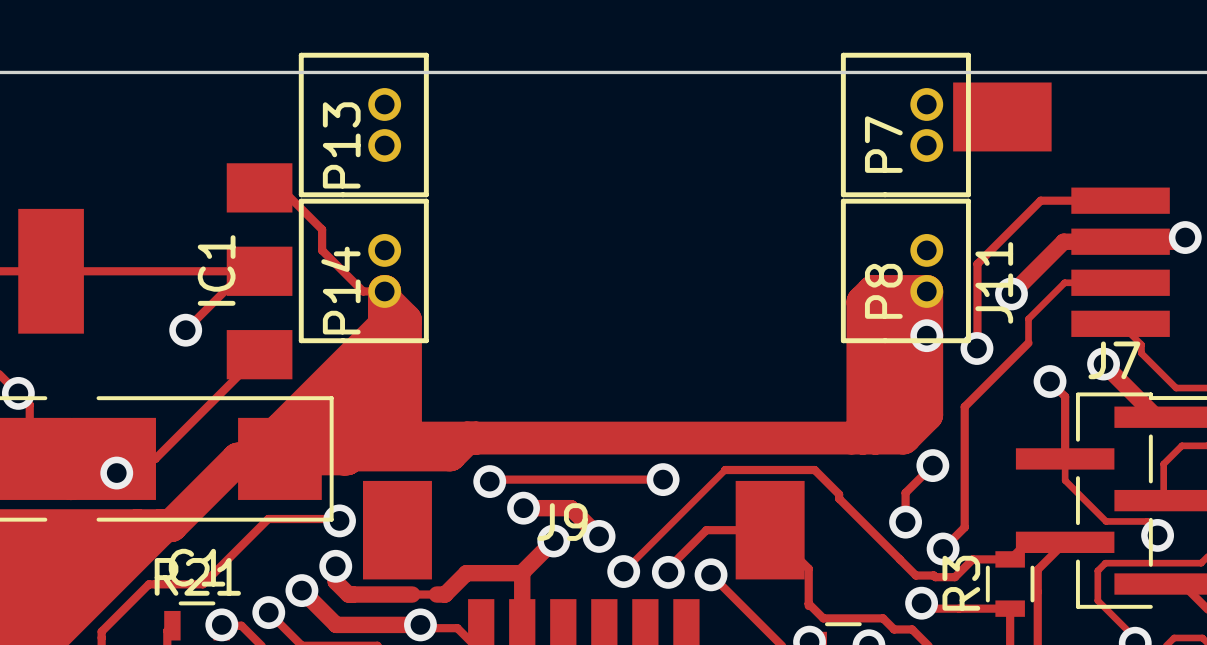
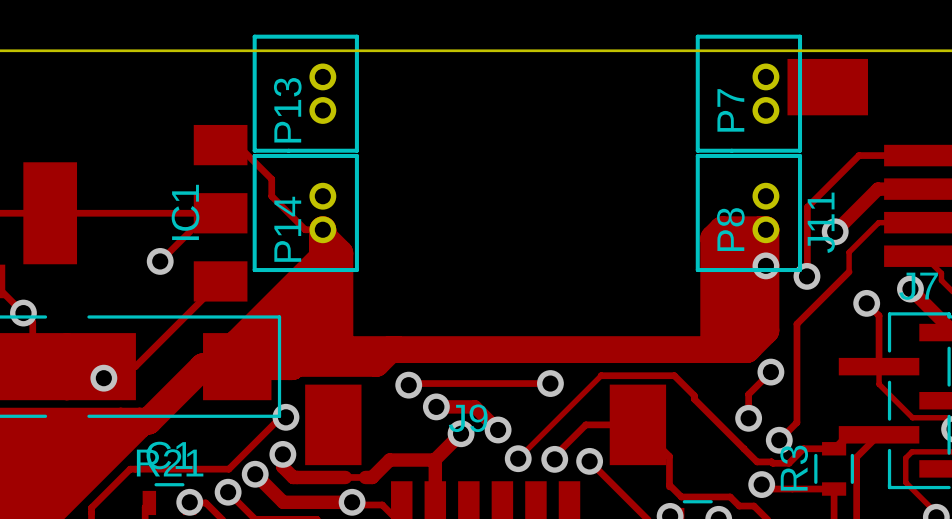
track: (339, 520) (337, 519) (268, 519) (202, 584) -> (286, 415) (281, 420) (277, 420) (228, 469) (174, 469)

